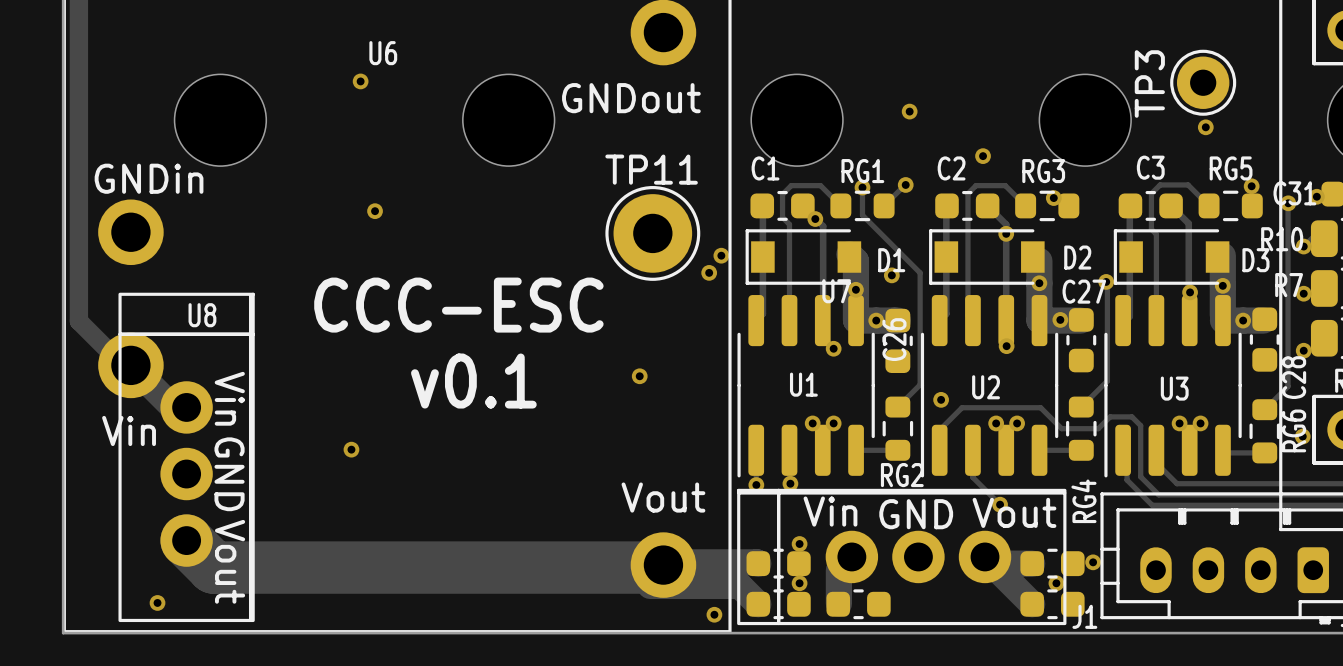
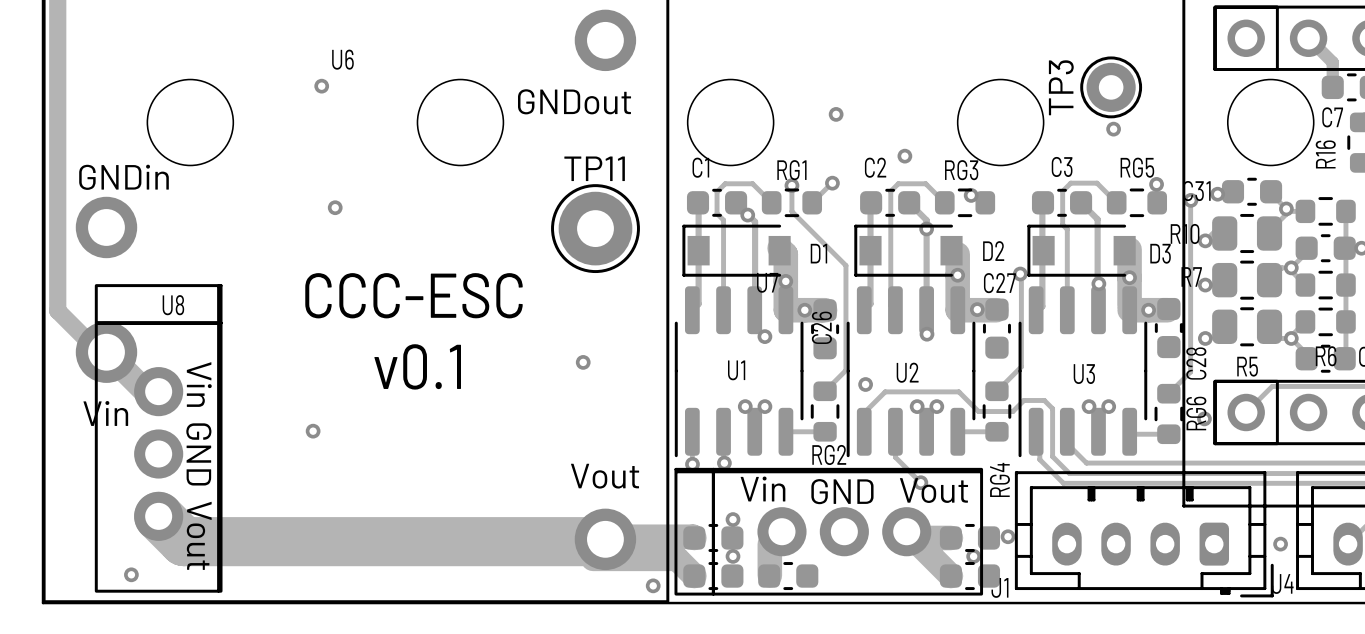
via: (721, 255) -> none
via: (709, 272) -> none
via: (891, 275) -> none

